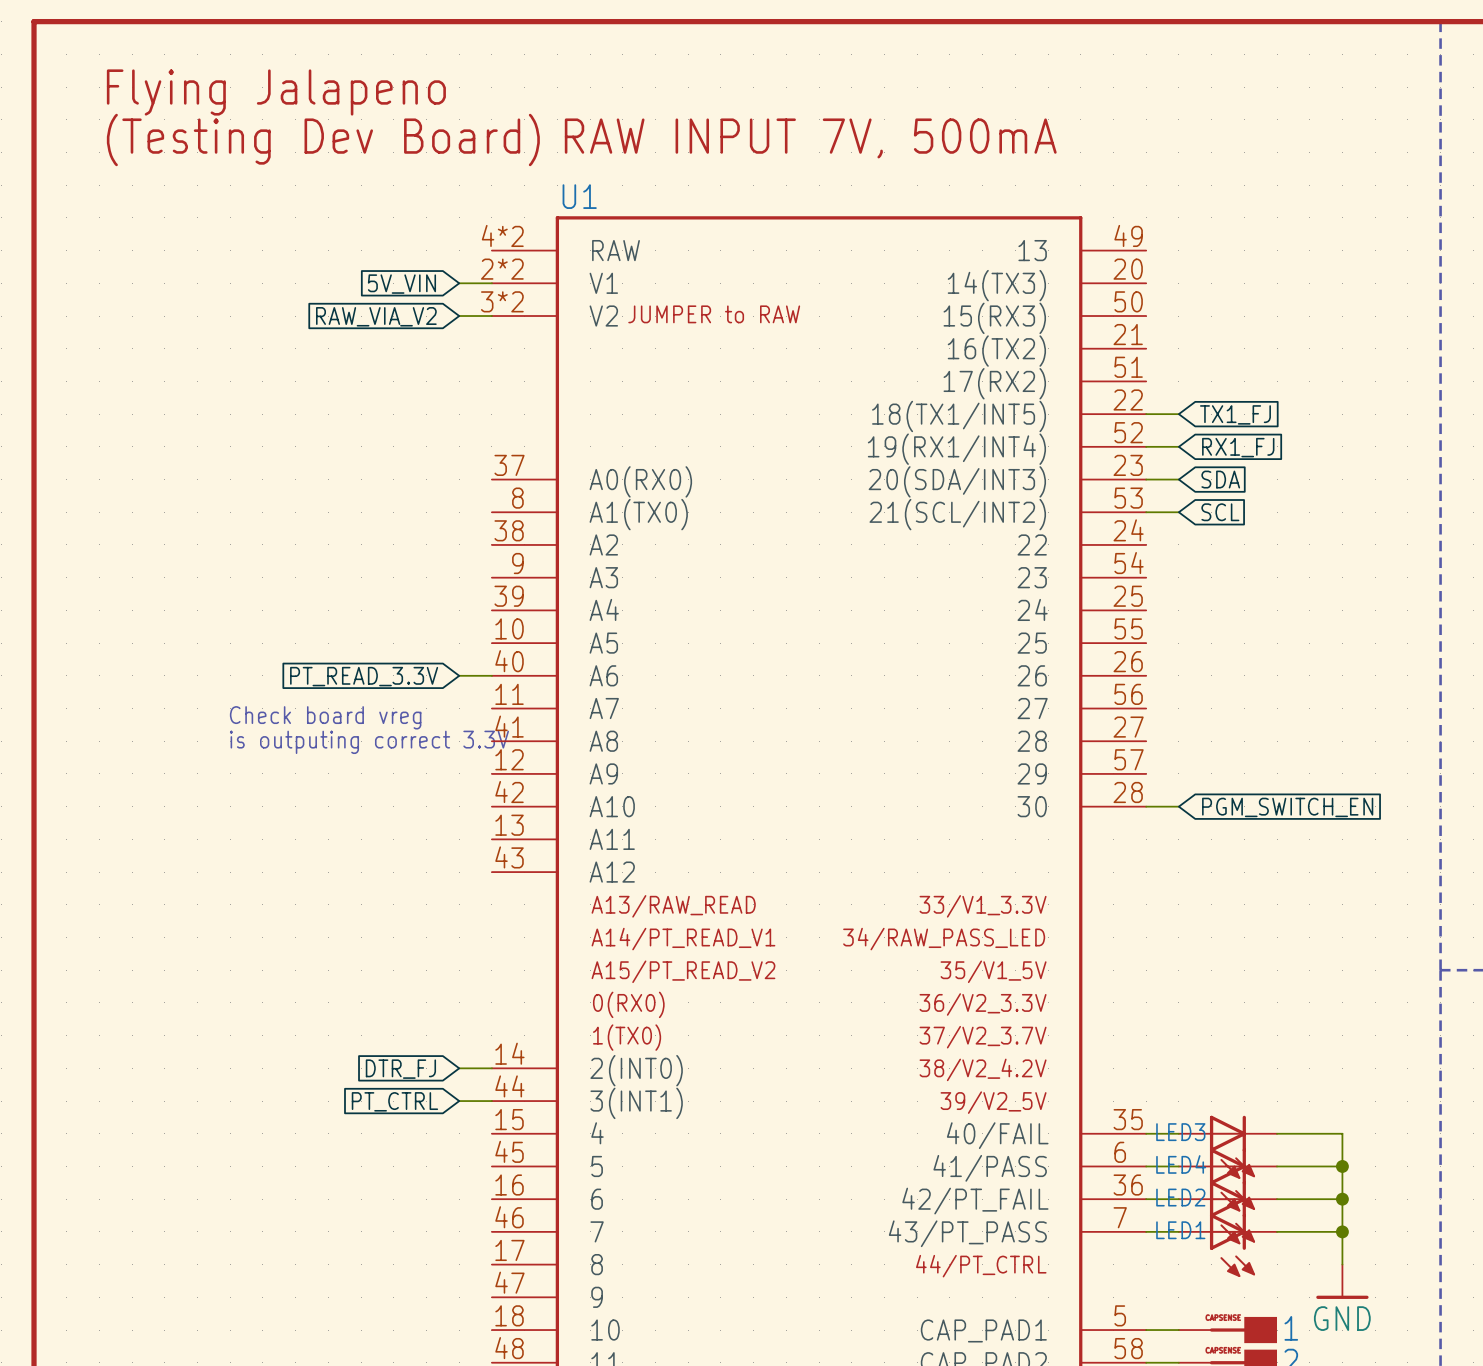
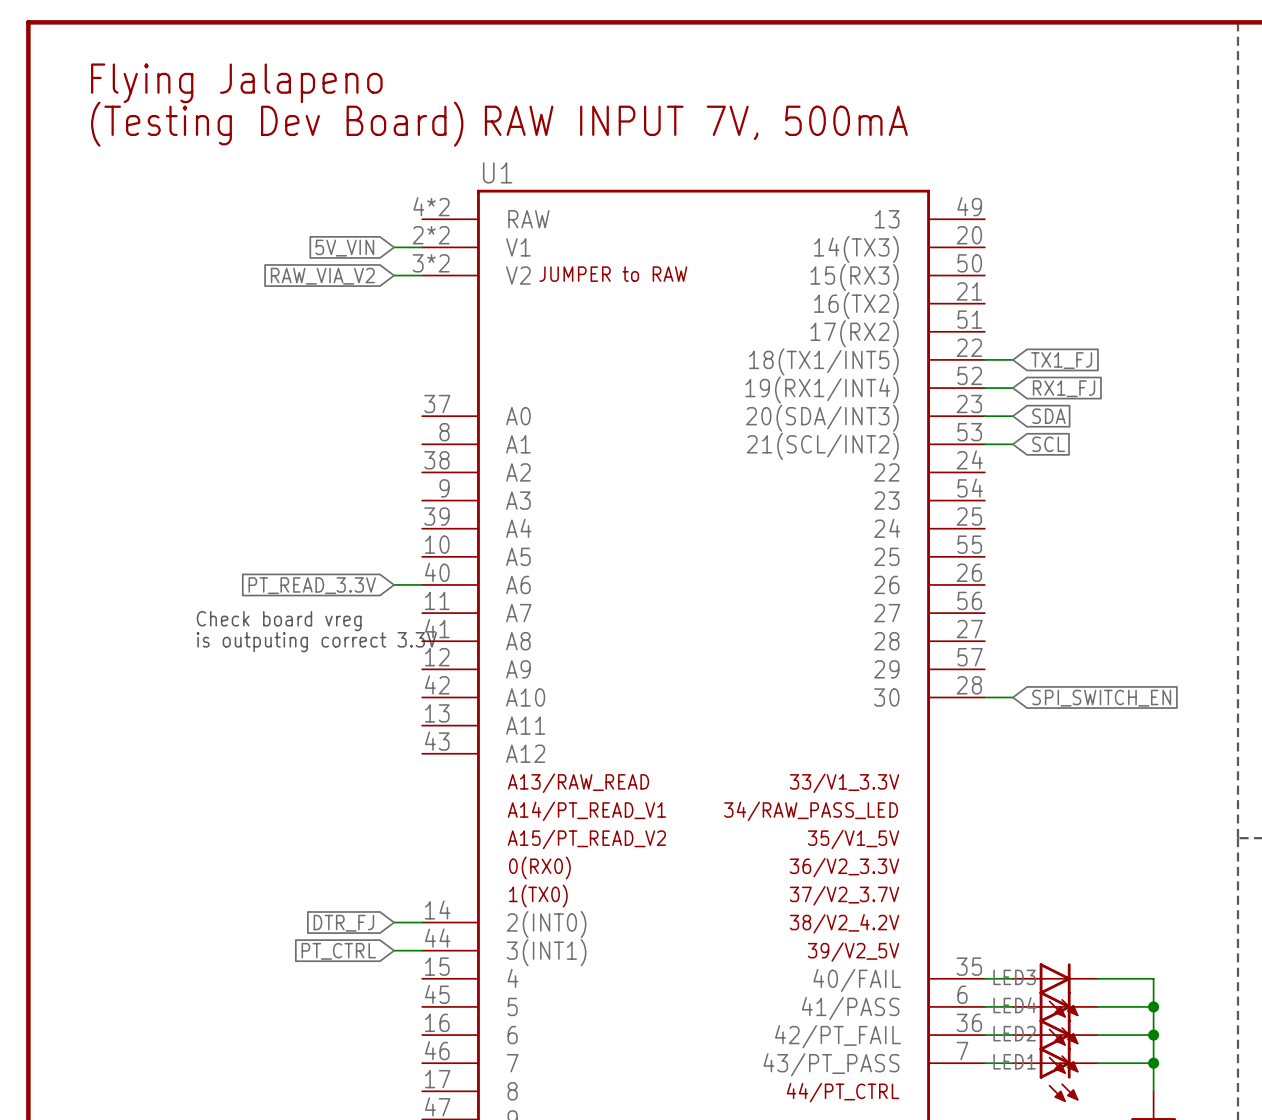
U1 pin name: A0(RX0) (640, 481) -> A0 (518, 416)
U1 pin name: A1(TX0) (638, 514) -> A1 (518, 444)
global label: PGM_SWITCH_EN (1287, 807) -> SPI_SWITCH_EN (1101, 698)

